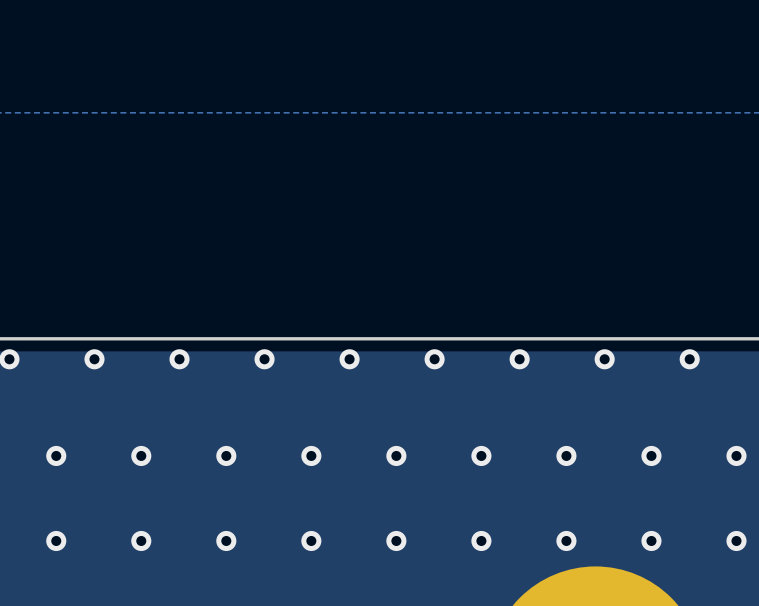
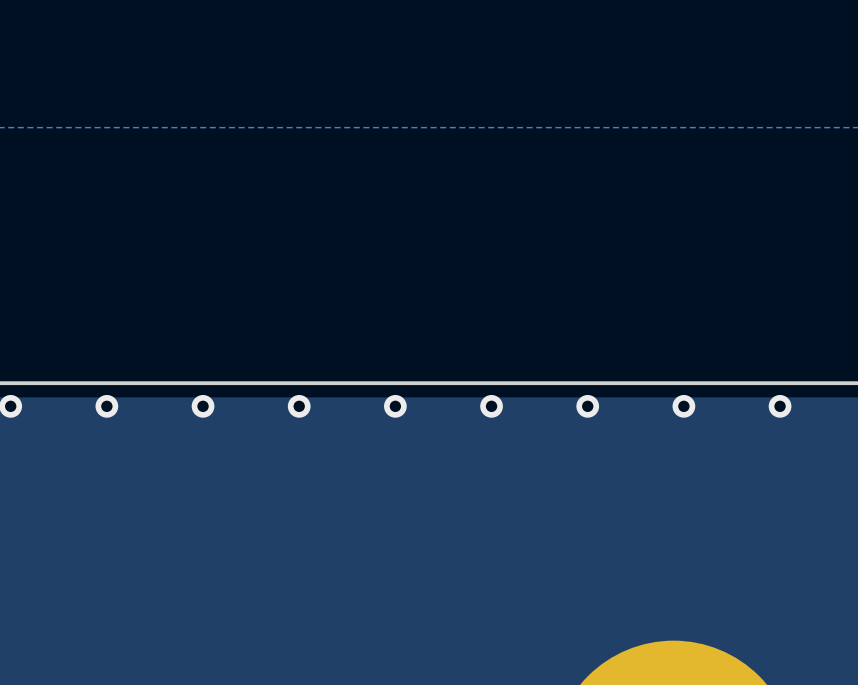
via: (56, 455) -> none
via: (141, 455) -> none
via: (226, 455) -> none
via: (311, 455) -> none
via: (396, 455) -> none
via: (481, 455) -> none
via: (566, 455) -> none
via: (651, 455) -> none
via: (736, 455) -> none
via: (56, 540) -> none
via: (141, 540) -> none
via: (226, 540) -> none
via: (311, 540) -> none
via: (396, 540) -> none
via: (481, 540) -> none
via: (566, 540) -> none
via: (651, 540) -> none
via: (736, 540) -> none

